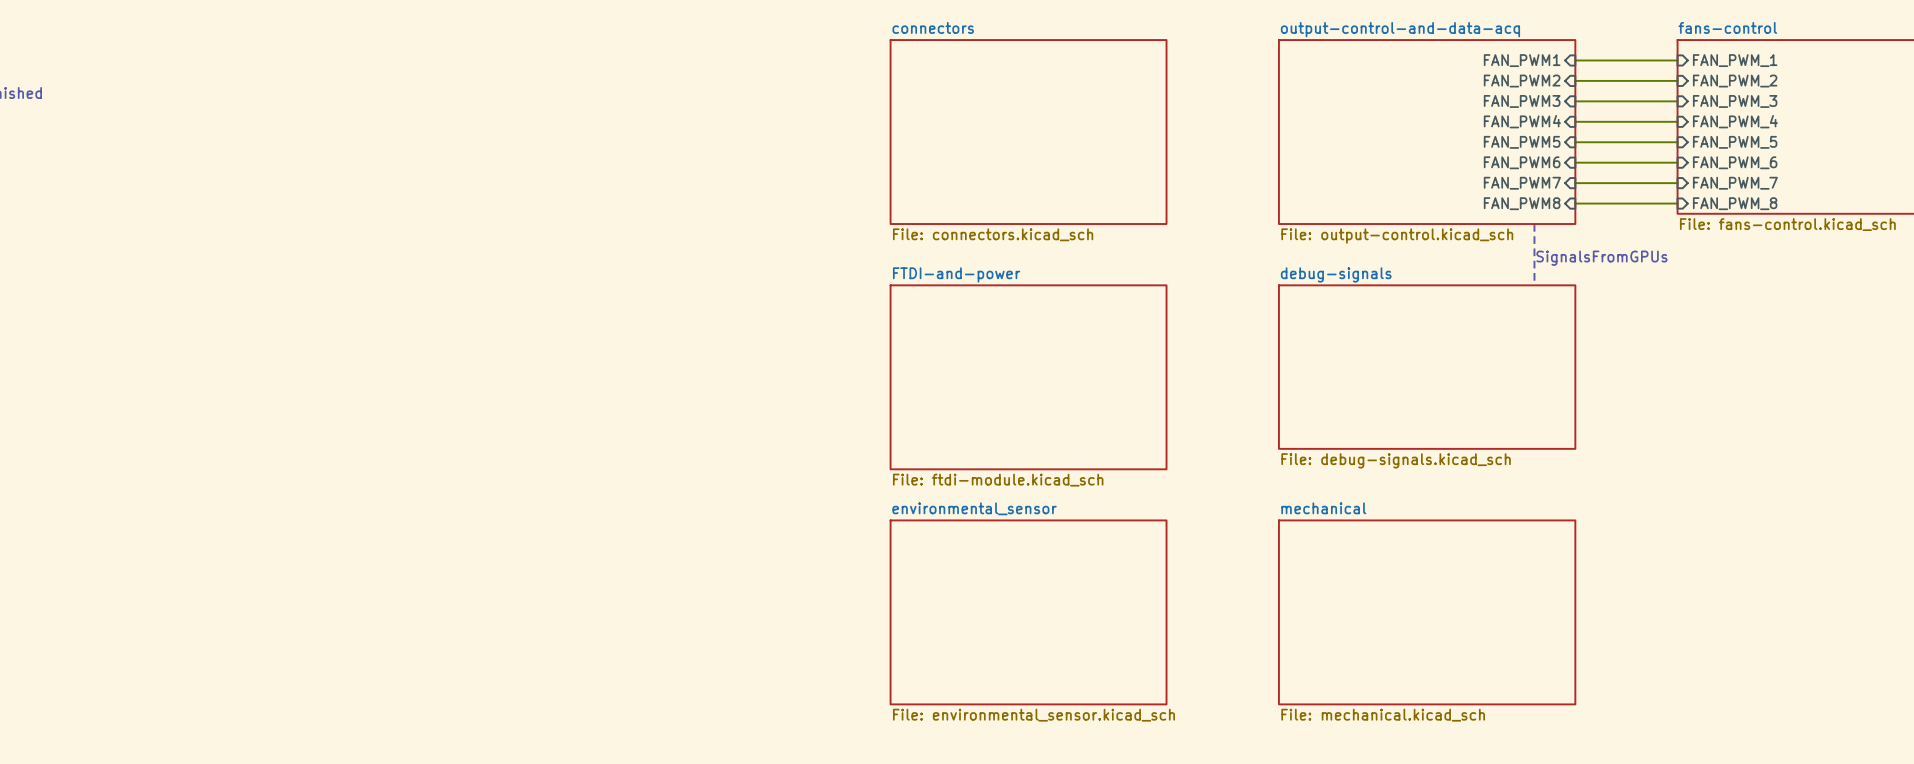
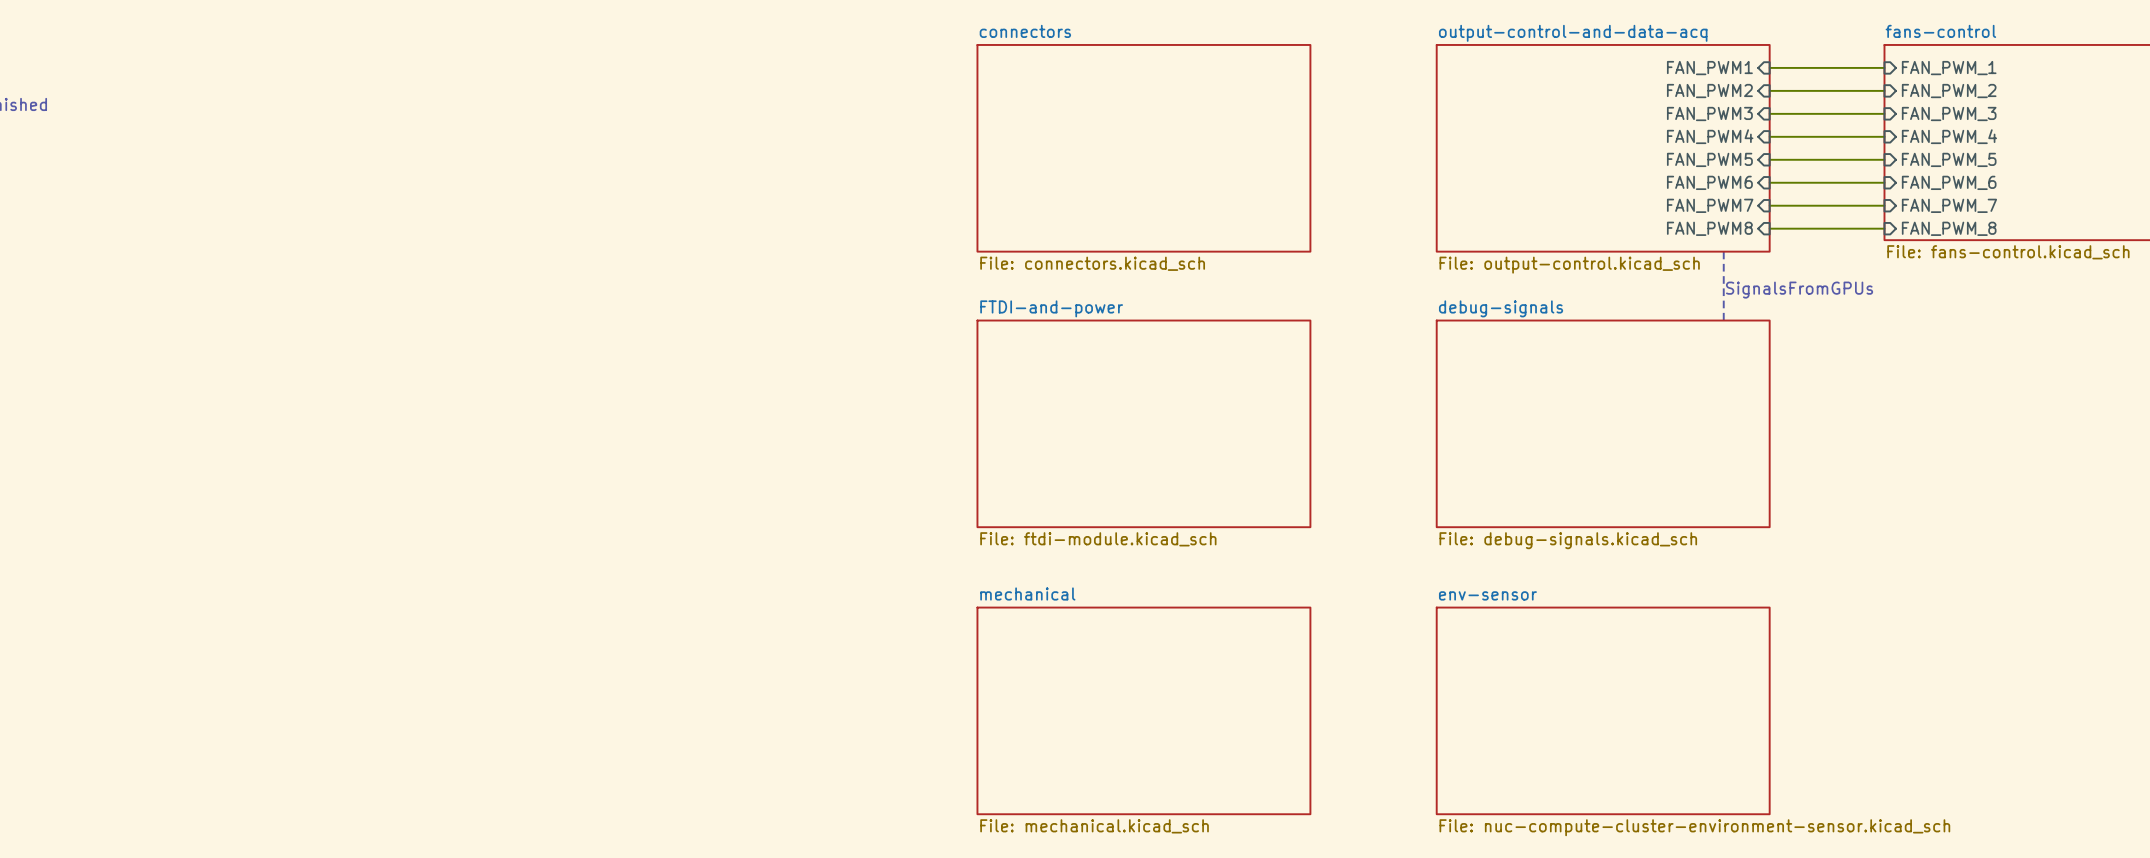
sheet connectors: none -> File: connectors.kicad_sch (1143, 148)
sheet connectors: File: connectors.kicad_sch (1028, 132) -> none
sheet debug-signals: File: debug-signals.kicad_sch (1427, 367) -> none
sheet FTDI-and-power: none -> File: ftdi-module.kicad_sch (1143, 423)
sheet FTDI-and-power: File: ftdi-module.kicad_sch (1028, 377) -> none
sheet debug-signals: none -> File: debug-signals.kicad_sch (1603, 423)
sheet environmental_sensor: File: environmental_sensor.kicad_sch (1028, 612) -> none
sheet mechanical: File: mechanical.kicad_sch (1427, 612) -> none
sheet mechanical: none -> File: mechanical.kicad_sch (1143, 710)
sheet env-sensor: none -> File: nuc-compute-cluster-environment-sensor.kicad_sch (1603, 710)

